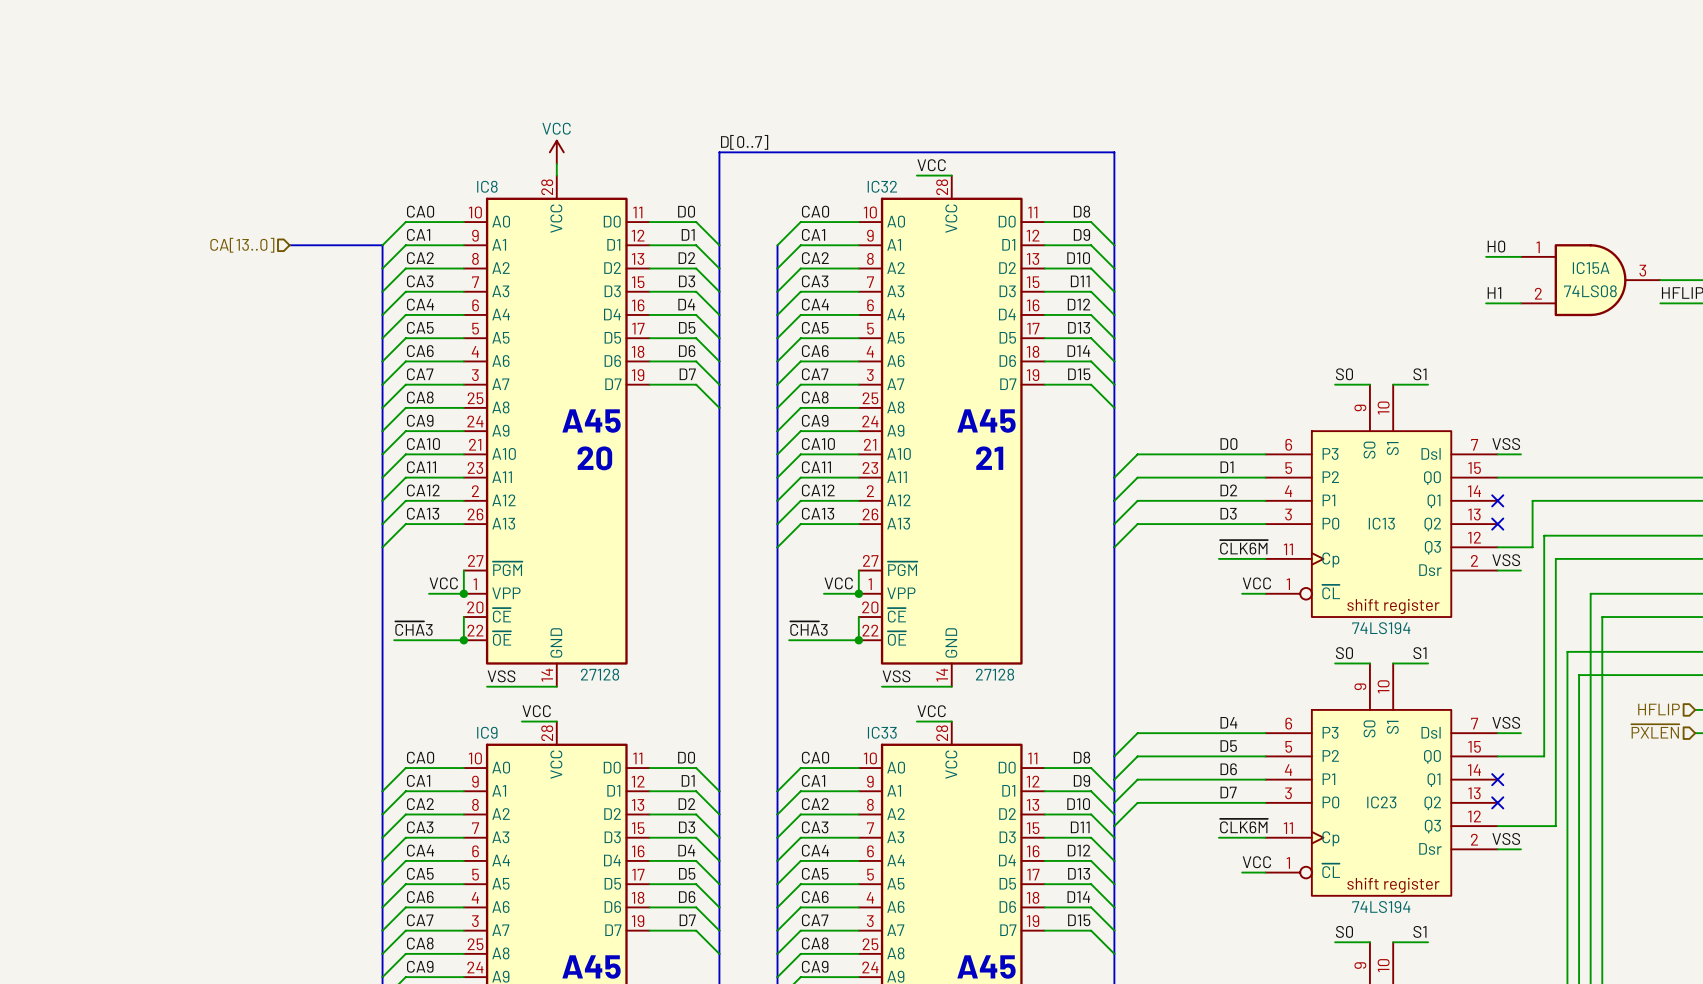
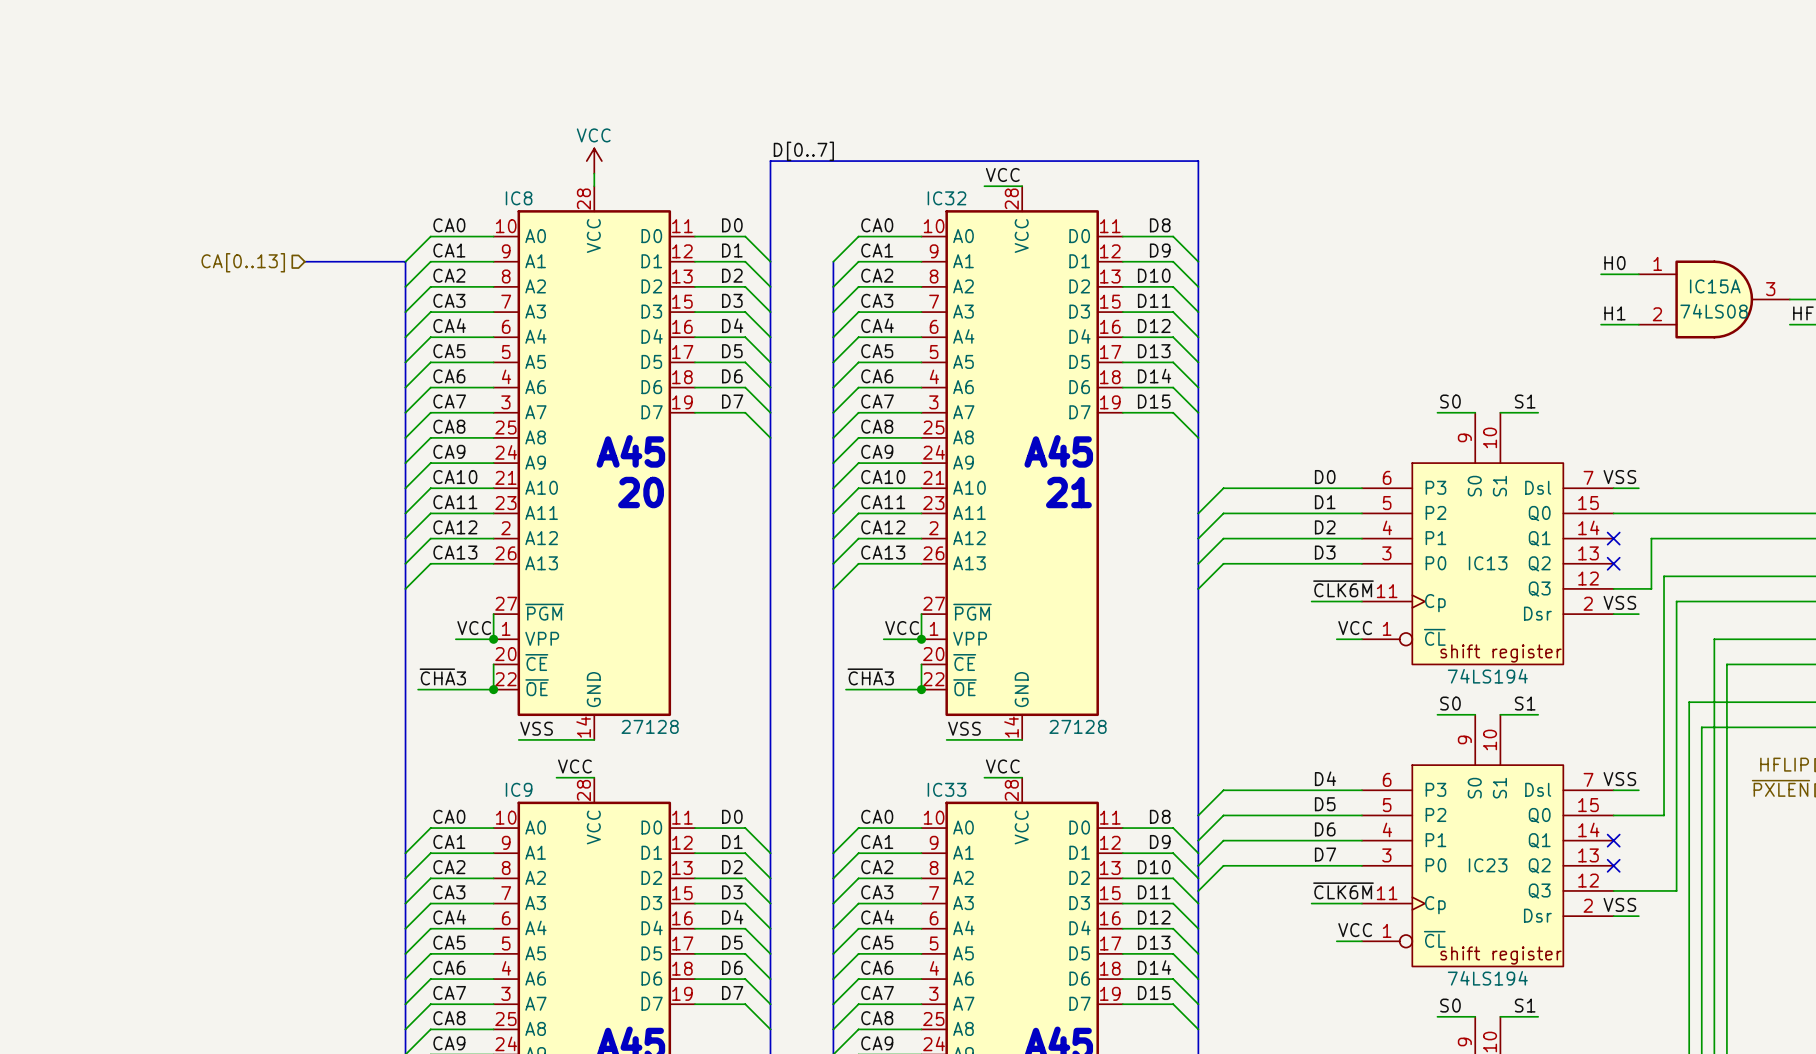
hierarchical label: CA[13..0] (242, 245) -> CA[0..13] (243, 262)

